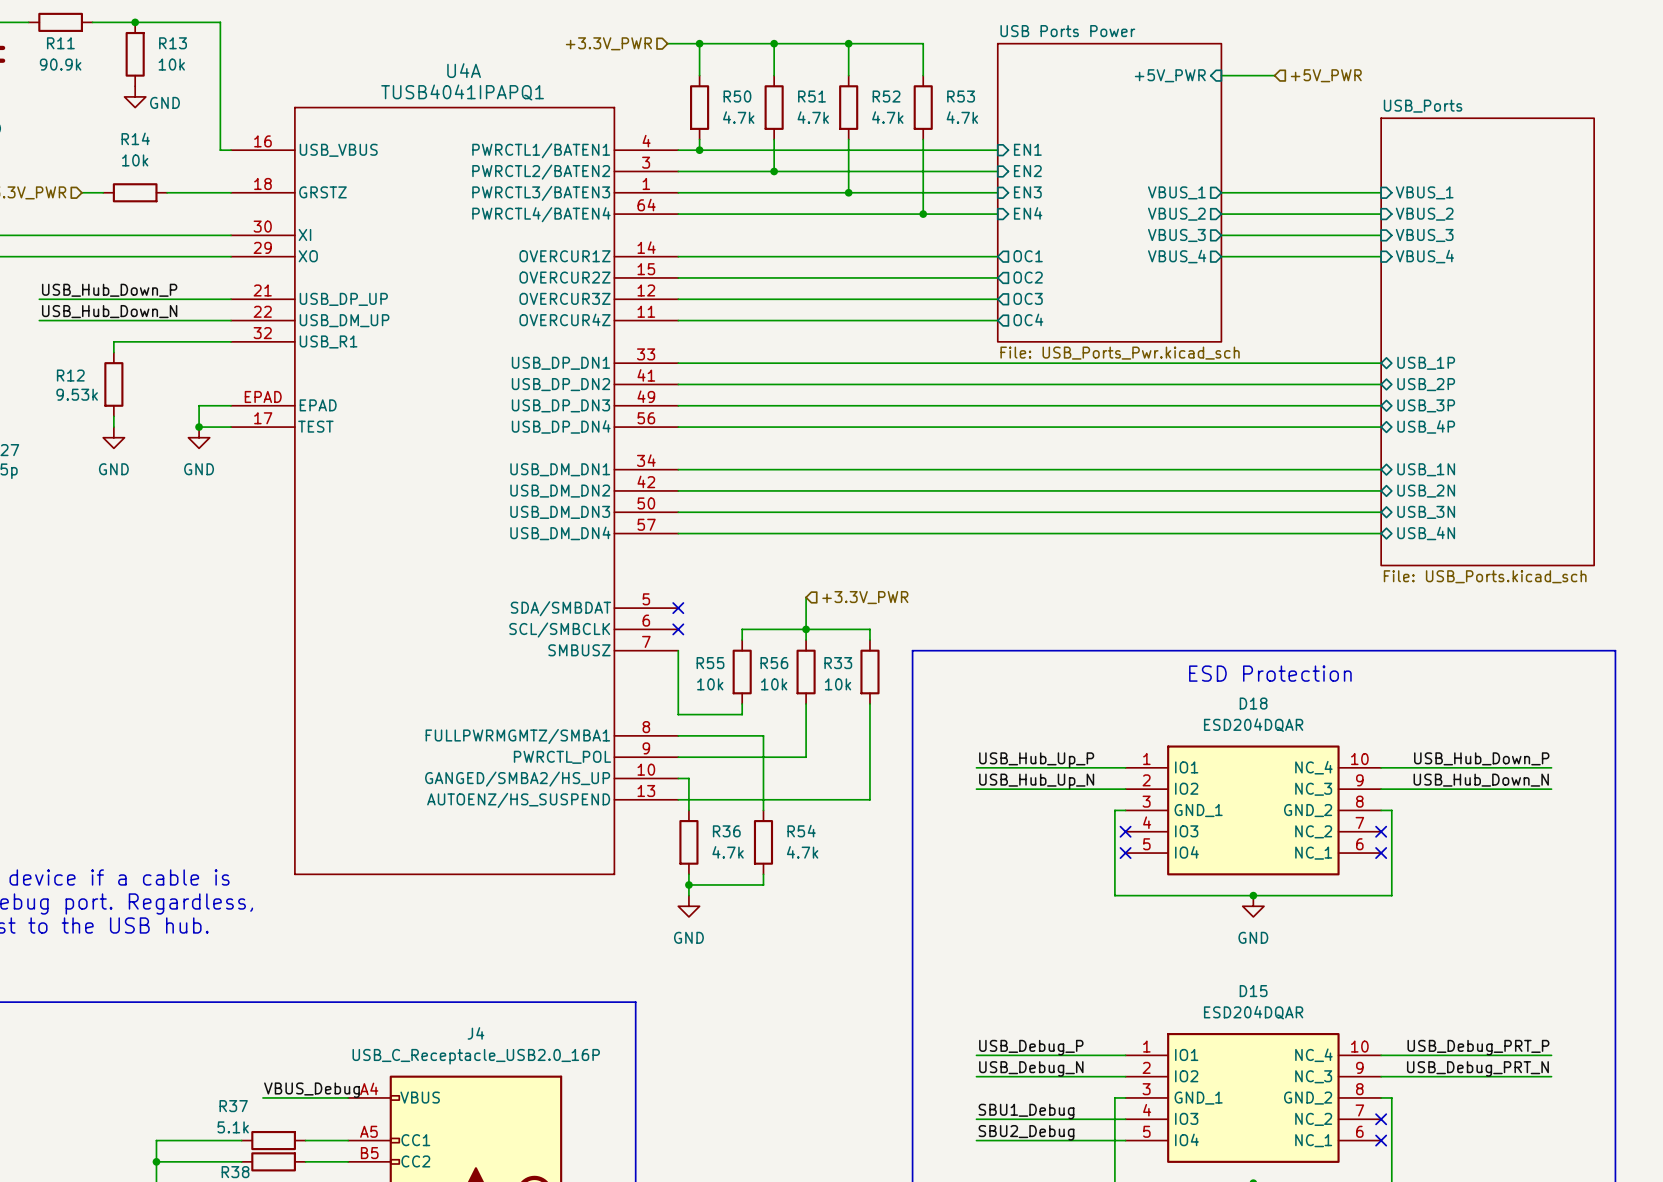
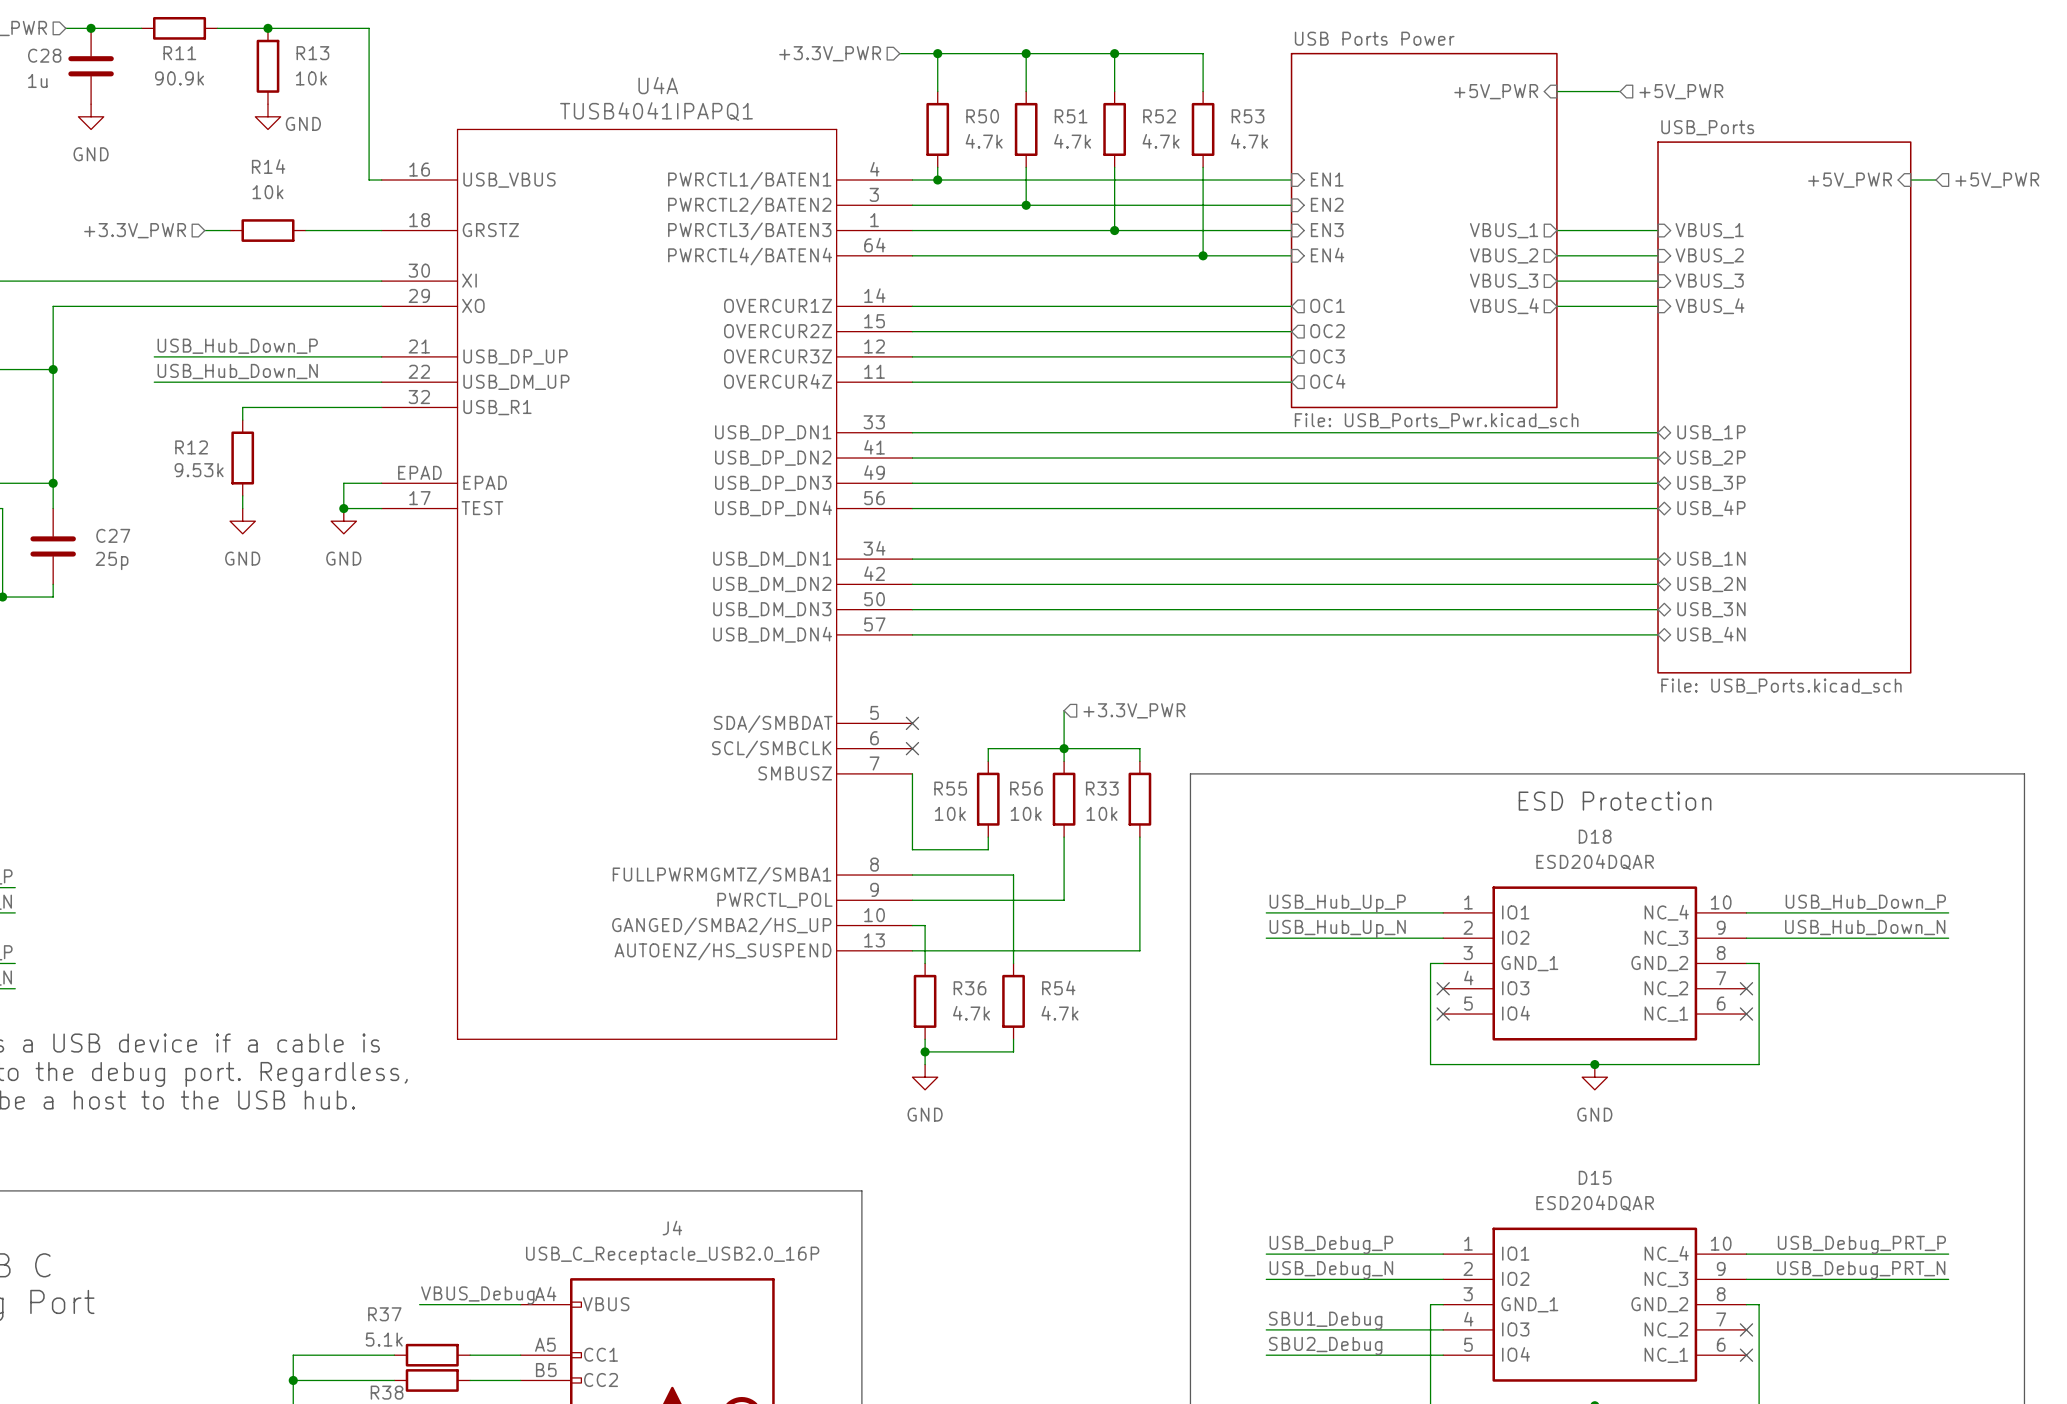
sheet pin: none -> +5V_PWR (1850, 180)
wire: none -> (1910, 180) (1936, 180)
hierarchical label: none -> +5V_PWR (1997, 180)
wire: (1306, 192) (1381, 192) -> none
sheet pin position: VBUS_1 (1424, 192) -> VBUS_1 (1709, 230)
wire: (1306, 214) (1381, 214) -> none
sheet pin position: VBUS_2 (1424, 214) -> VBUS_2 (1709, 255)
wire: (1306, 235) (1381, 235) -> none
sheet pin position: VBUS_3 (1424, 235) -> VBUS_3 (1709, 281)
wire: (1306, 256) (1381, 256) -> none
sheet pin position: VBUS_4 (1424, 256) -> VBUS_4 (1709, 306)
sheet USB_Ports position: (1487, 341) -> (1784, 407)
wire: (1306, 363) (1381, 363) -> none
sheet pin position: USB_1P (1426, 363) -> USB_1P (1711, 432)
wire: (1306, 384) (1381, 384) -> none
sheet pin position: USB_2P (1426, 384) -> USB_2P (1711, 458)
wire: (1306, 405) (1381, 405) -> none
sheet pin position: USB_3P (1426, 405) -> USB_3P (1711, 483)
sheet pin position: USB_4P (1426, 426) -> USB_4P (1711, 508)
wire: (1306, 427) (1381, 427) -> none
wire: (1306, 469) (1381, 469) -> none
sheet pin position: USB_1N (1426, 469) -> USB_1N (1711, 559)
wire: (1306, 490) (1381, 490) -> none
sheet pin position: USB_2N (1426, 491) -> USB_2N (1711, 584)
wire: (1306, 512) (1381, 512) -> none
sheet pin position: USB_3N (1426, 512) -> USB_3N (1711, 609)
wire: (1306, 533) (1381, 533) -> none
sheet pin position: USB_4N (1426, 533) -> USB_4N (1711, 634)

